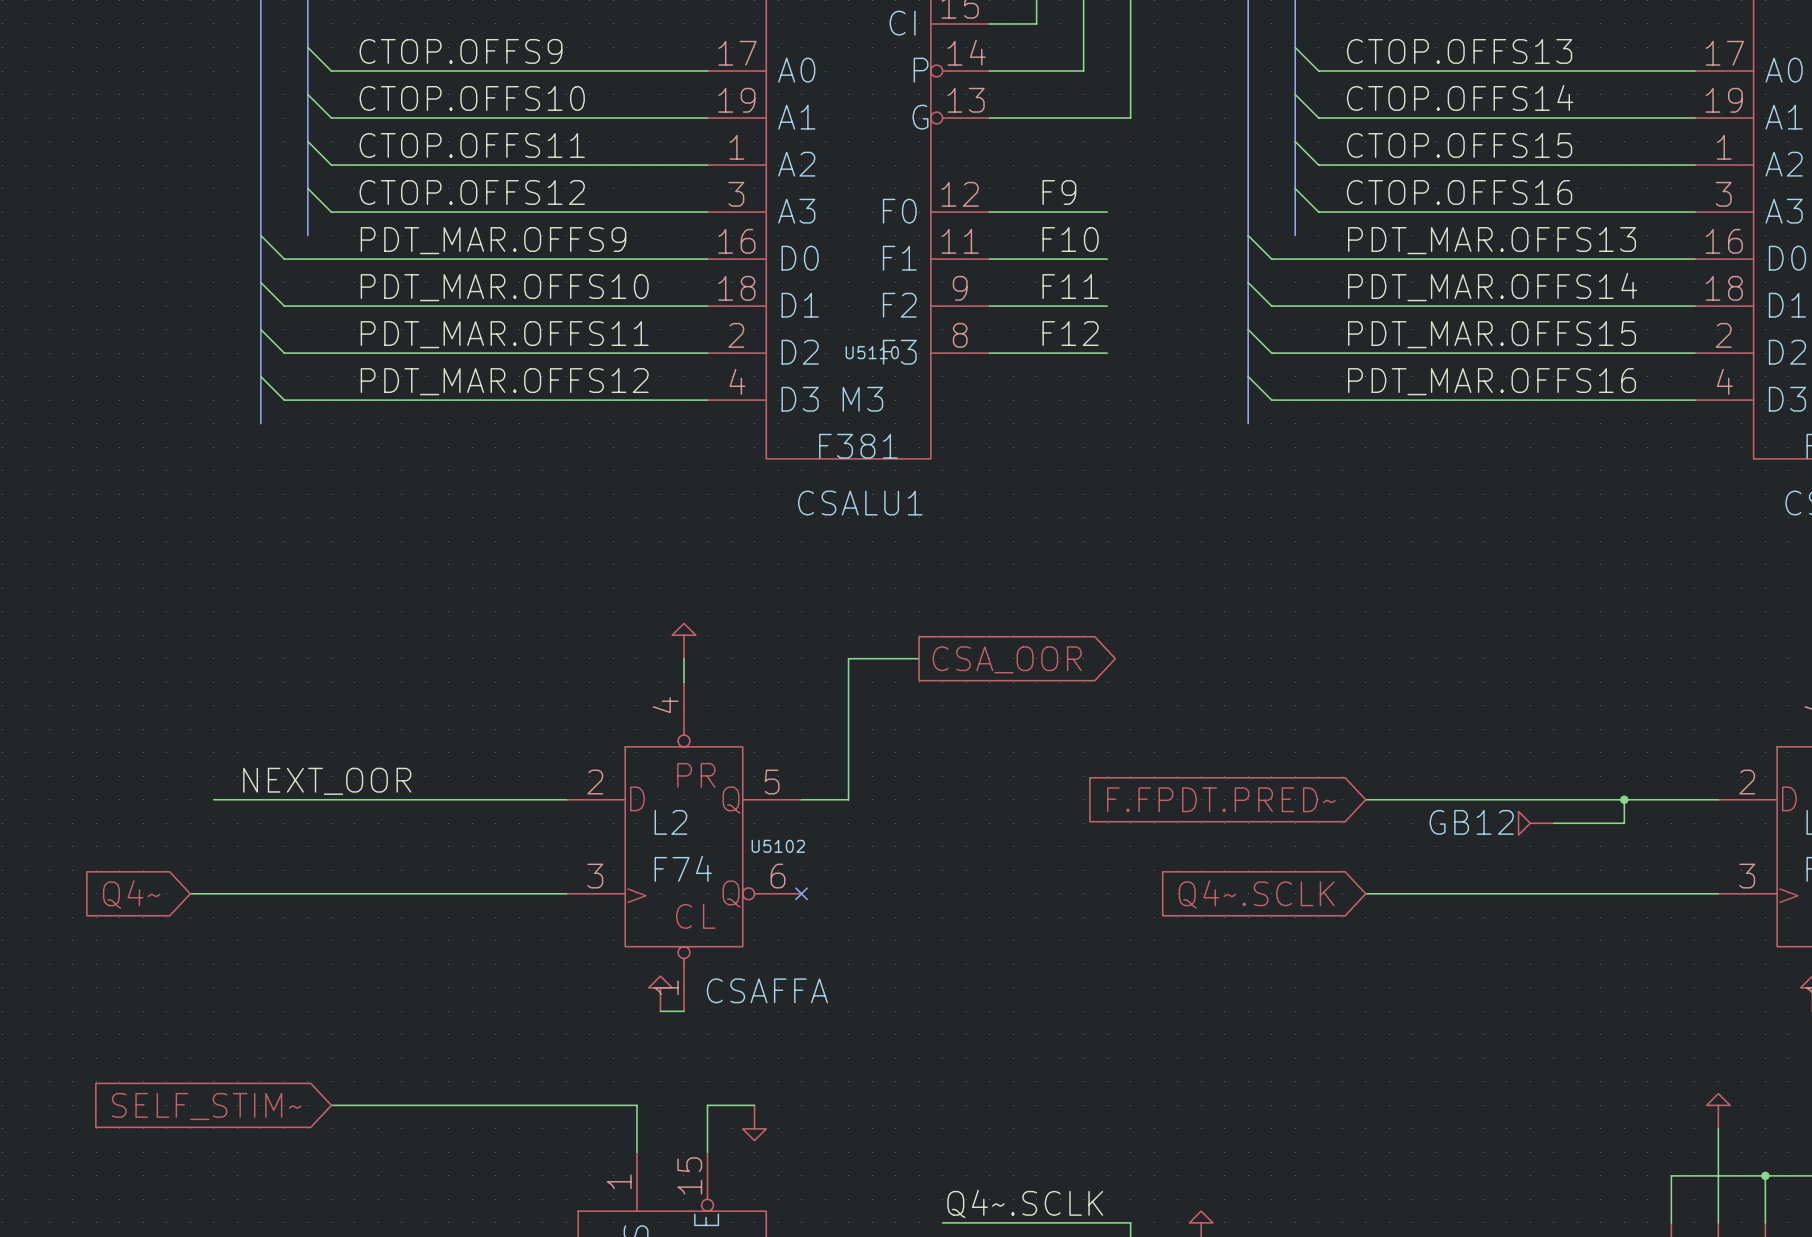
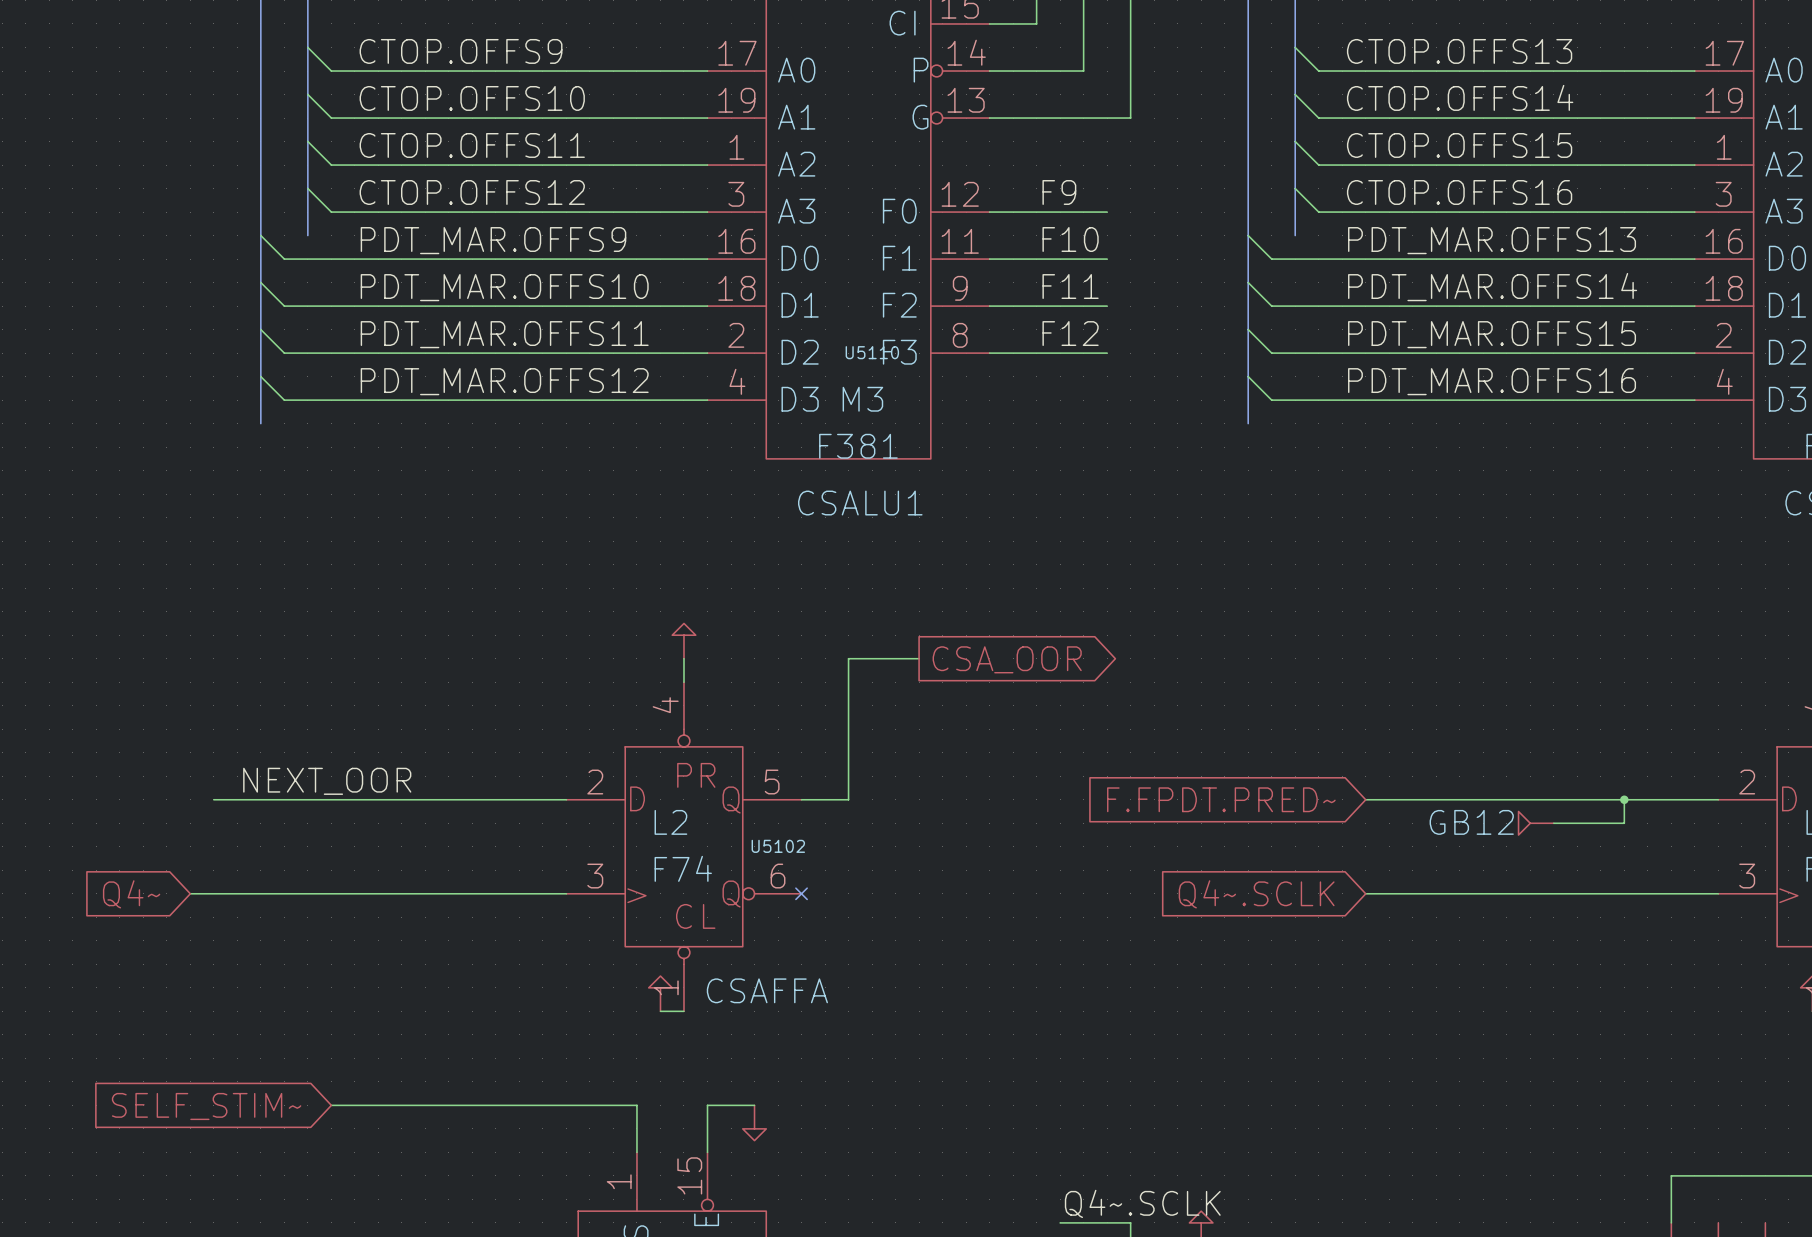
power symbol: (1718, 1110) -> none
wire: (1718, 1128) (1718, 1222) -> none
wire: (1765, 1175) (1765, 1222) -> none
junction: (1765, 1175) -> none
label position: Q4~.SCLK (1025, 1203) -> Q4~.SCLK (1142, 1203)
wire: (942, 1222) (1060, 1222) -> none

